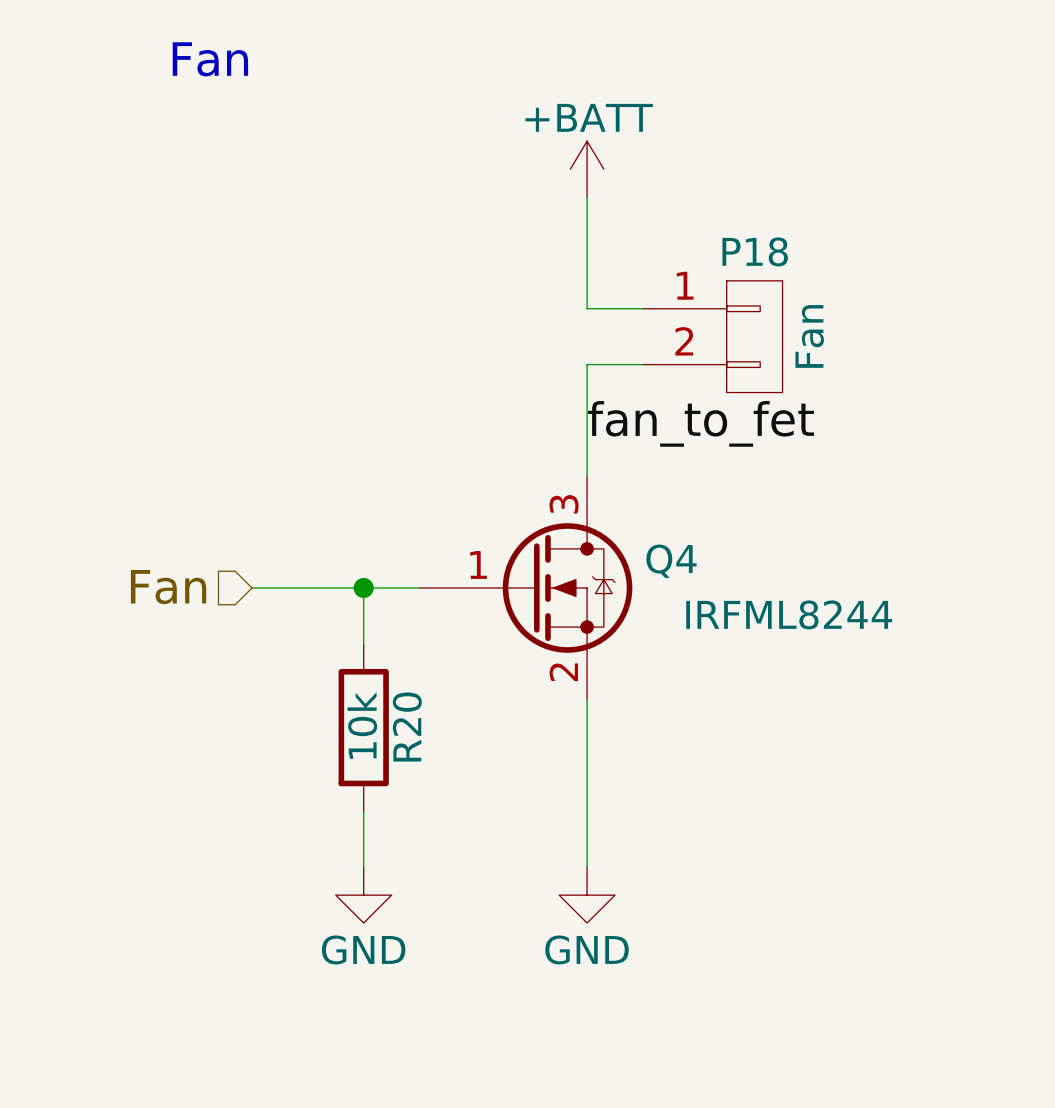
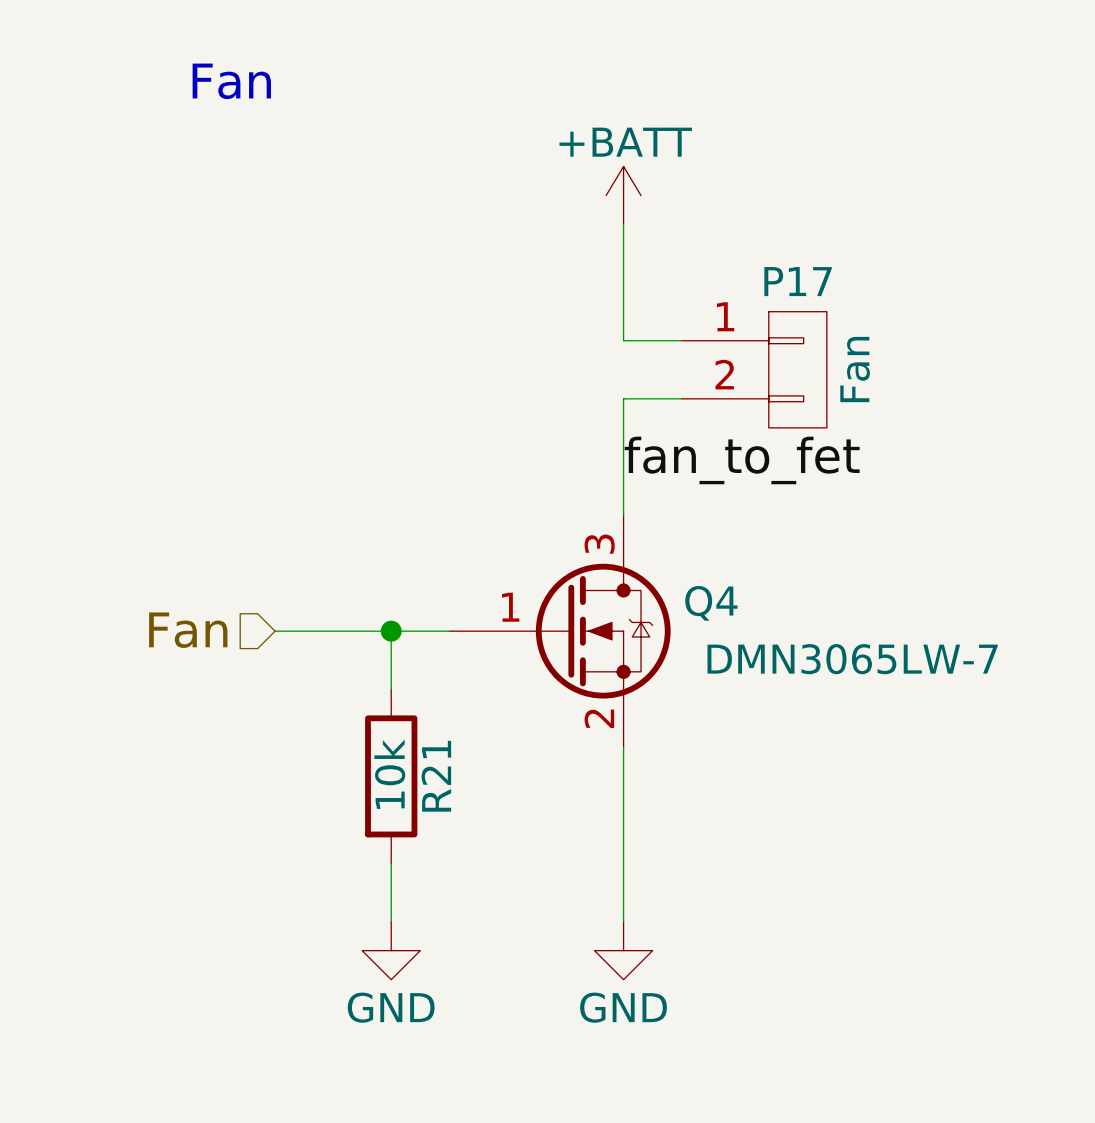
P18 name: P18 (755, 251) -> P17 (798, 281)
Q4 value: IRFML8244 (789, 614) -> DMN3065LW-7 (852, 659)
R20 name: R20 (407, 727) -> R21 (436, 776)

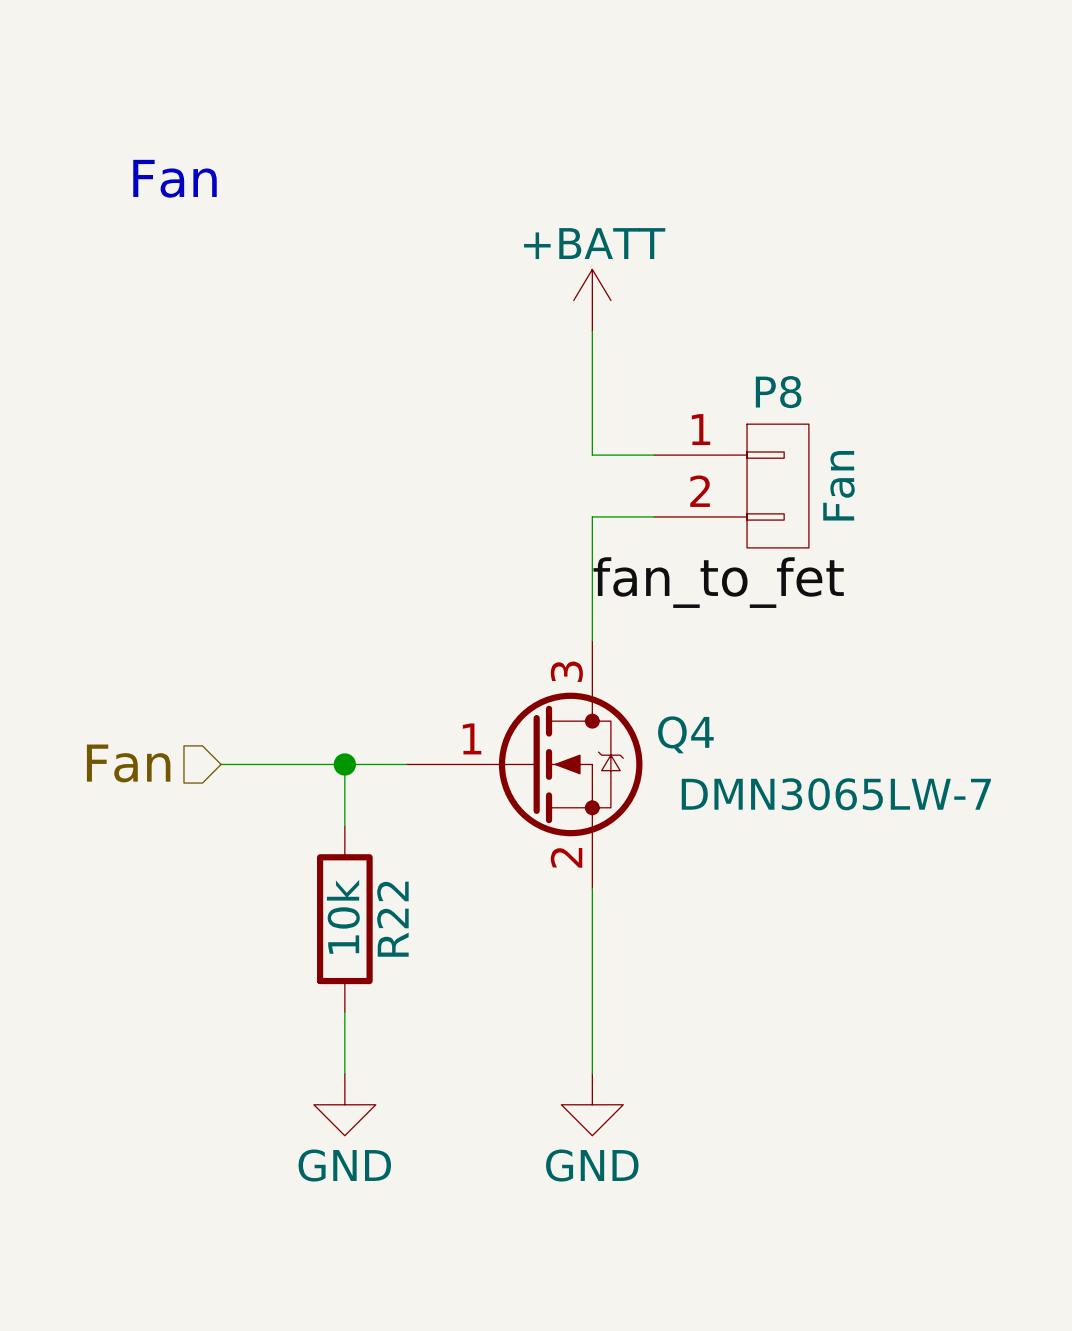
P17 name: P17 (798, 281) -> P8 (778, 392)
R21 name: R21 (436, 776) -> R22 (392, 919)

